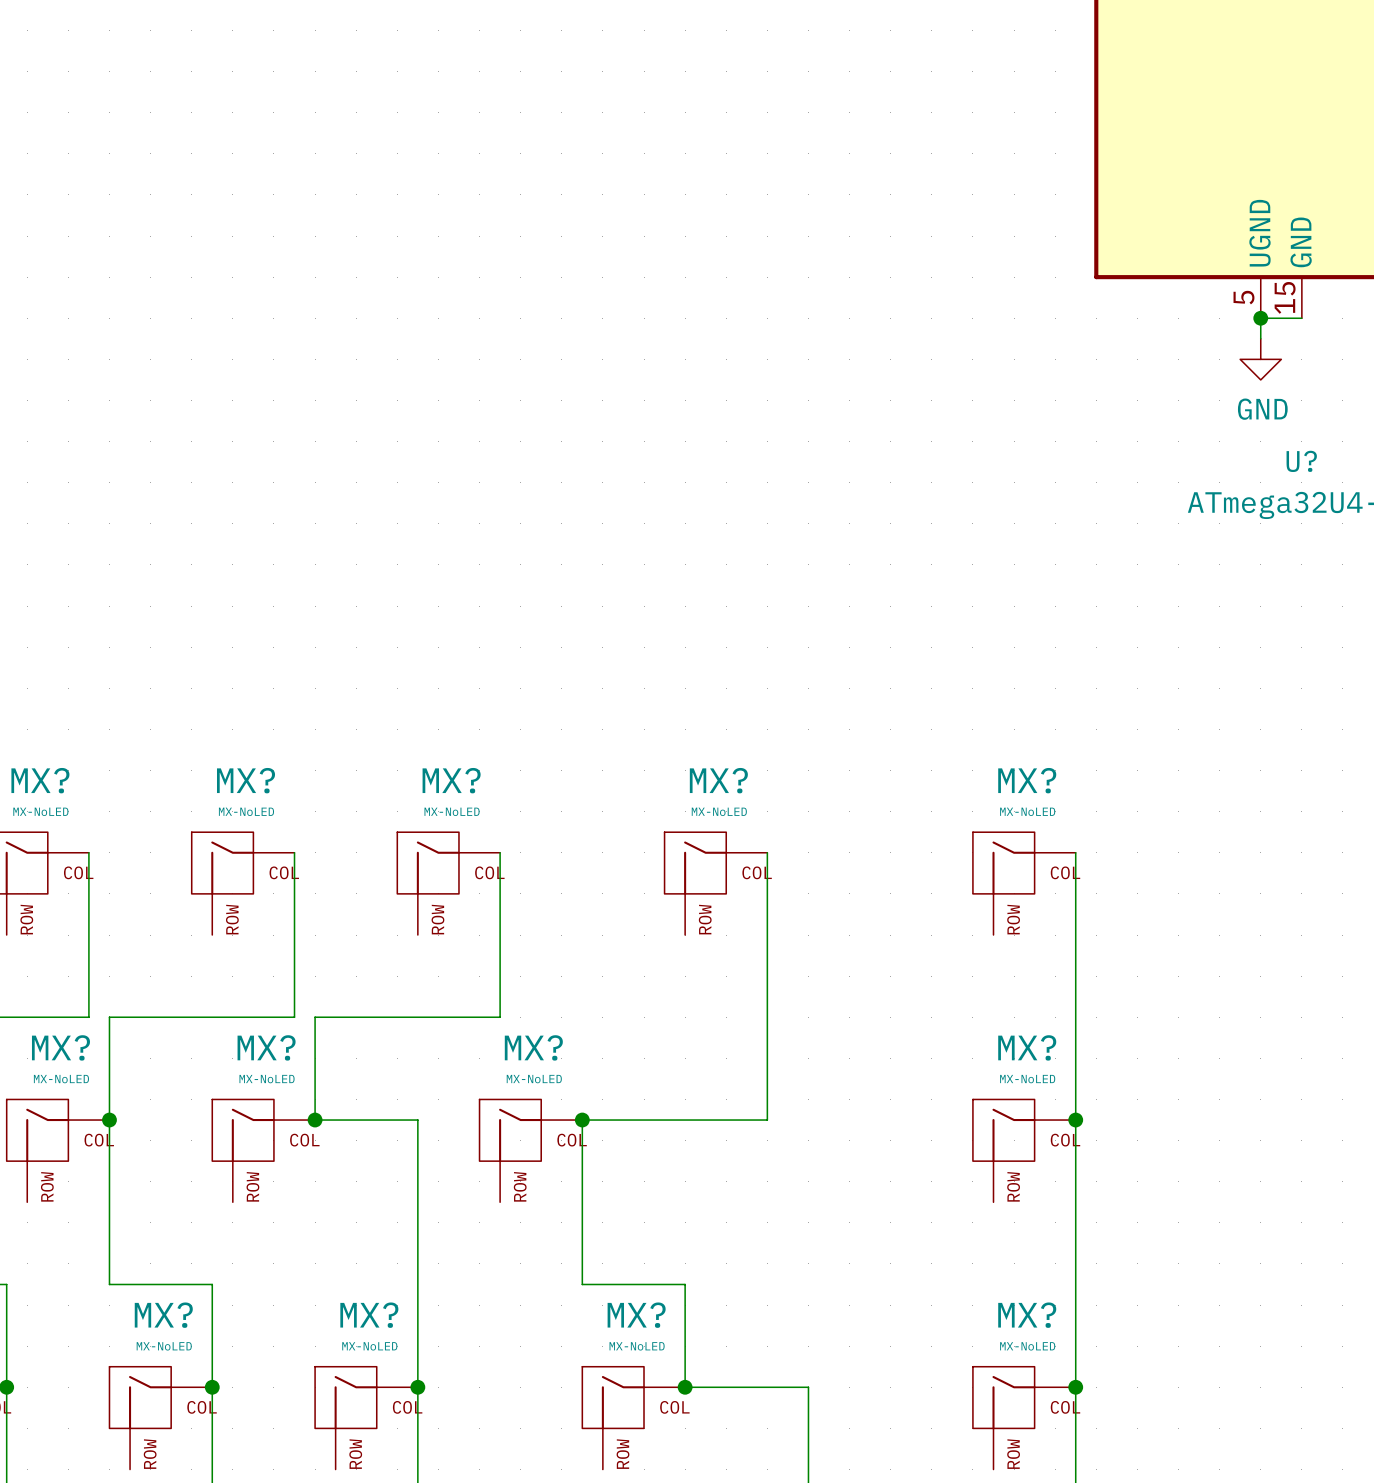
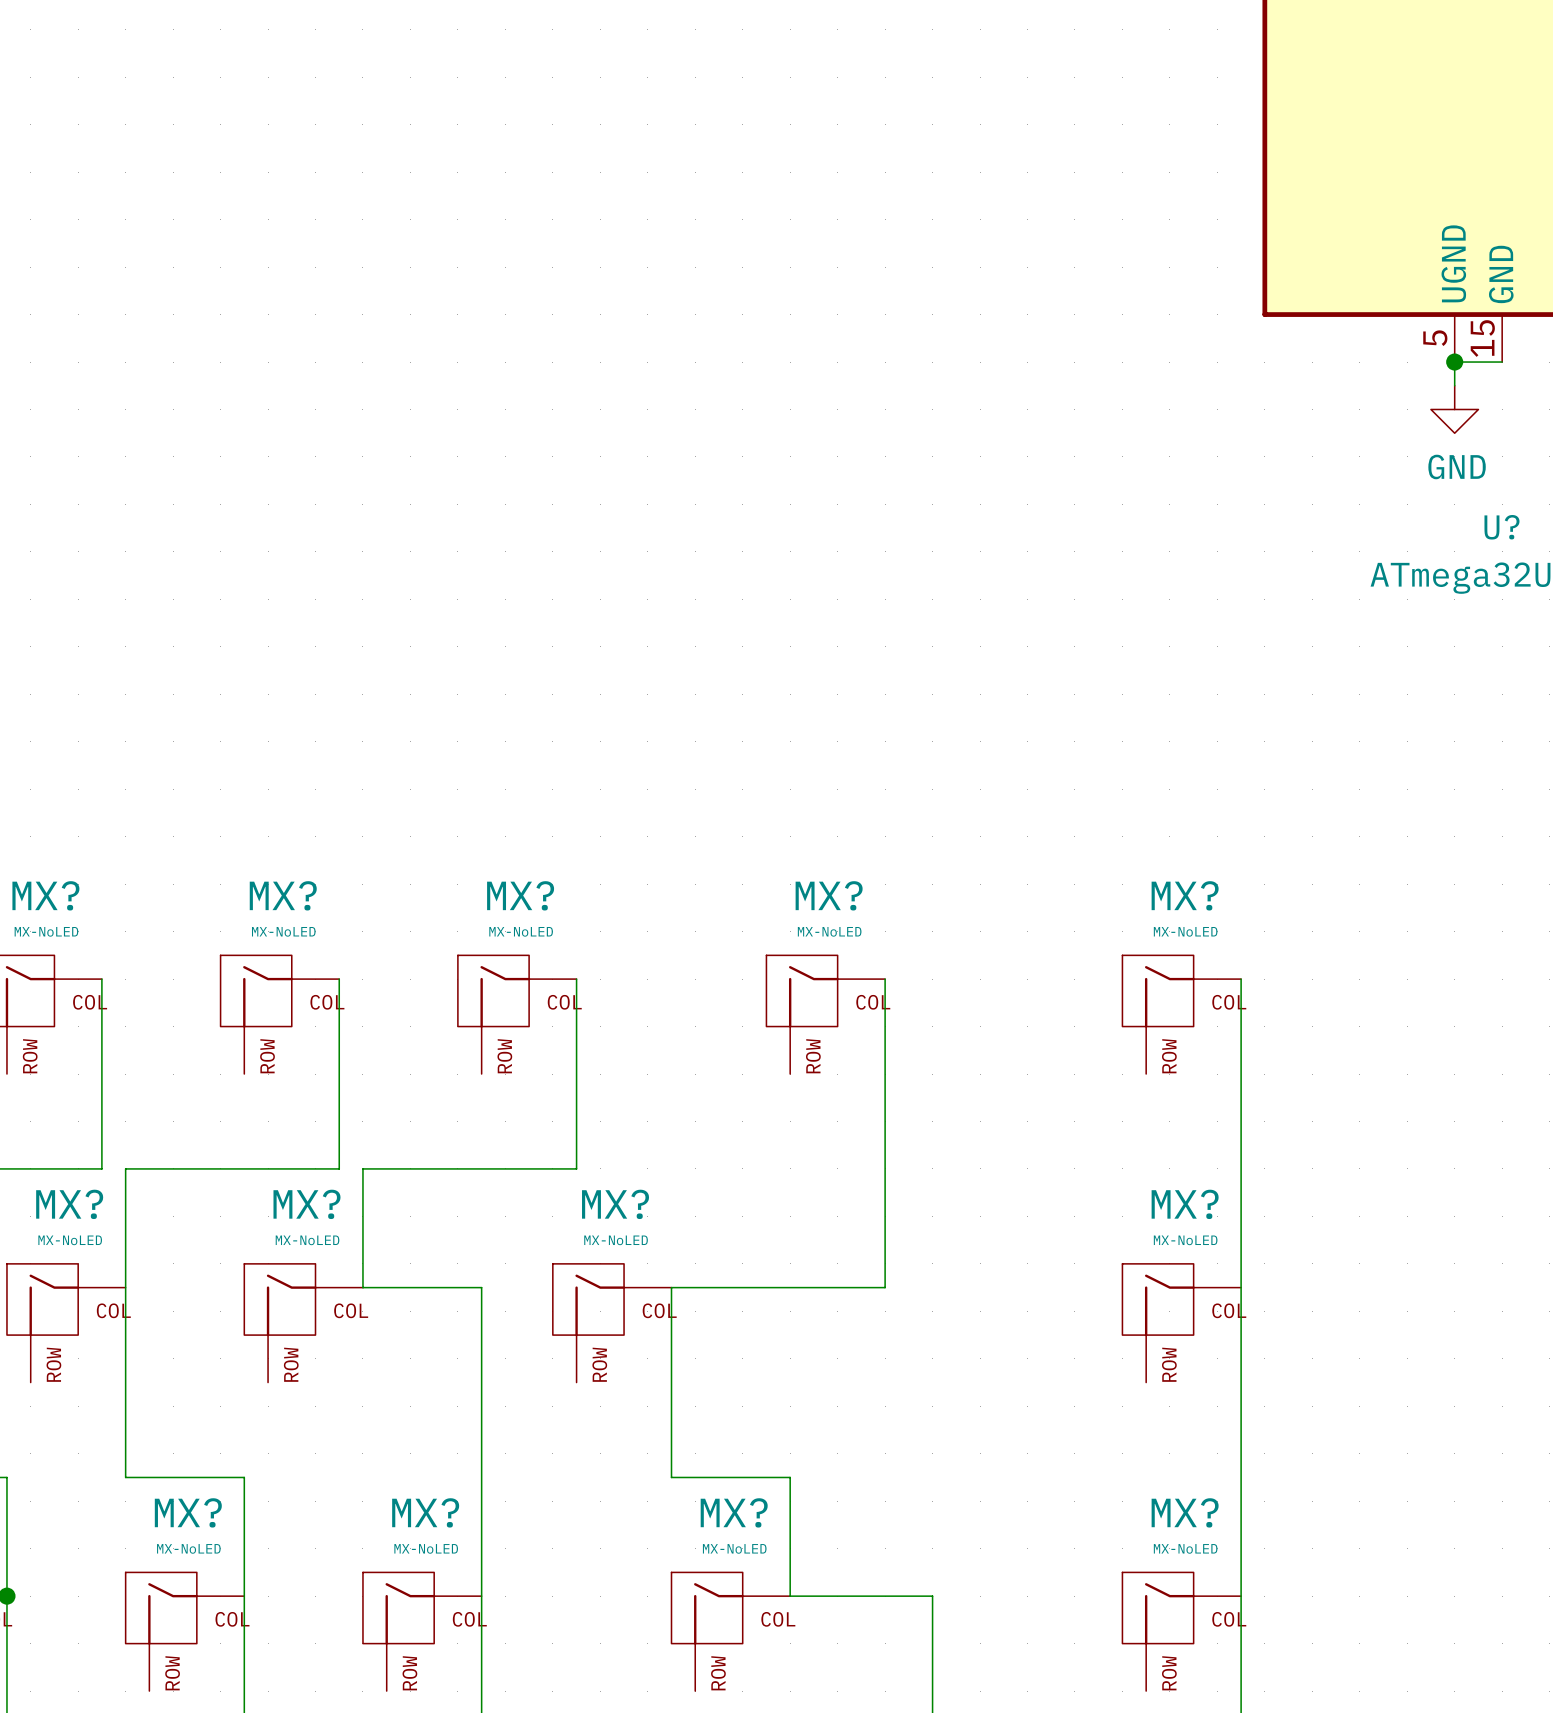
junction: (109, 1120) -> none
junction: (315, 1120) -> none
junction: (582, 1120) -> none
junction: (1075, 1120) -> none
junction: (212, 1387) -> none
junction: (417, 1387) -> none
junction: (685, 1387) -> none
junction: (1075, 1387) -> none

